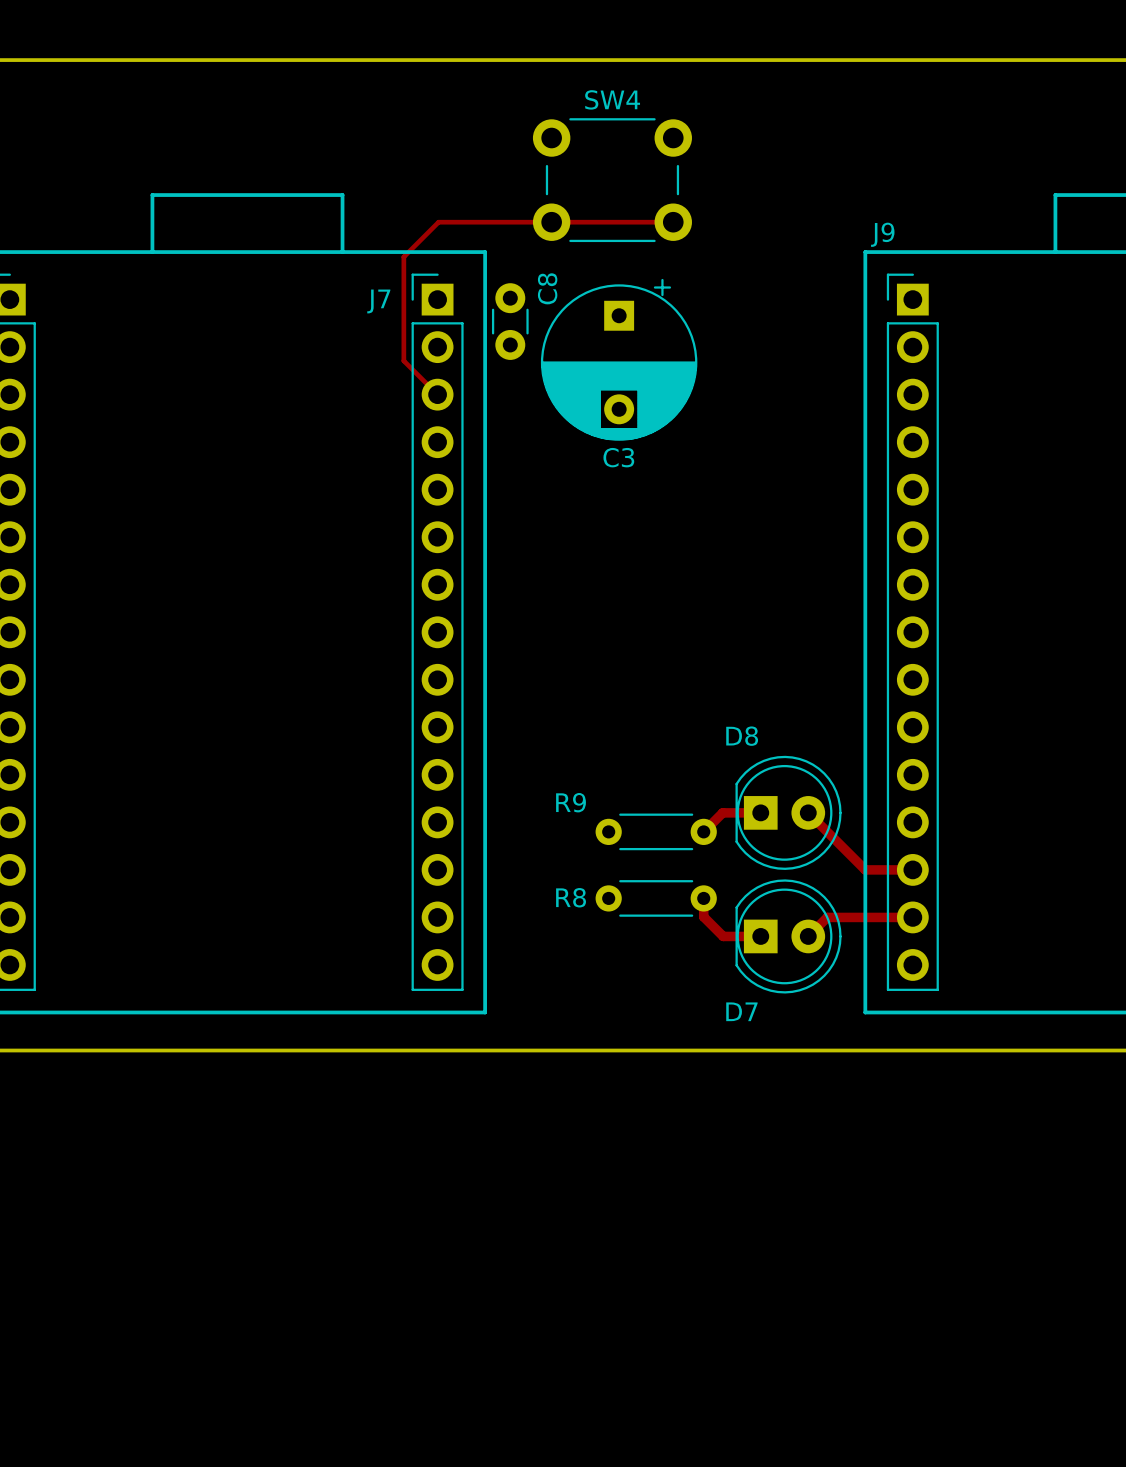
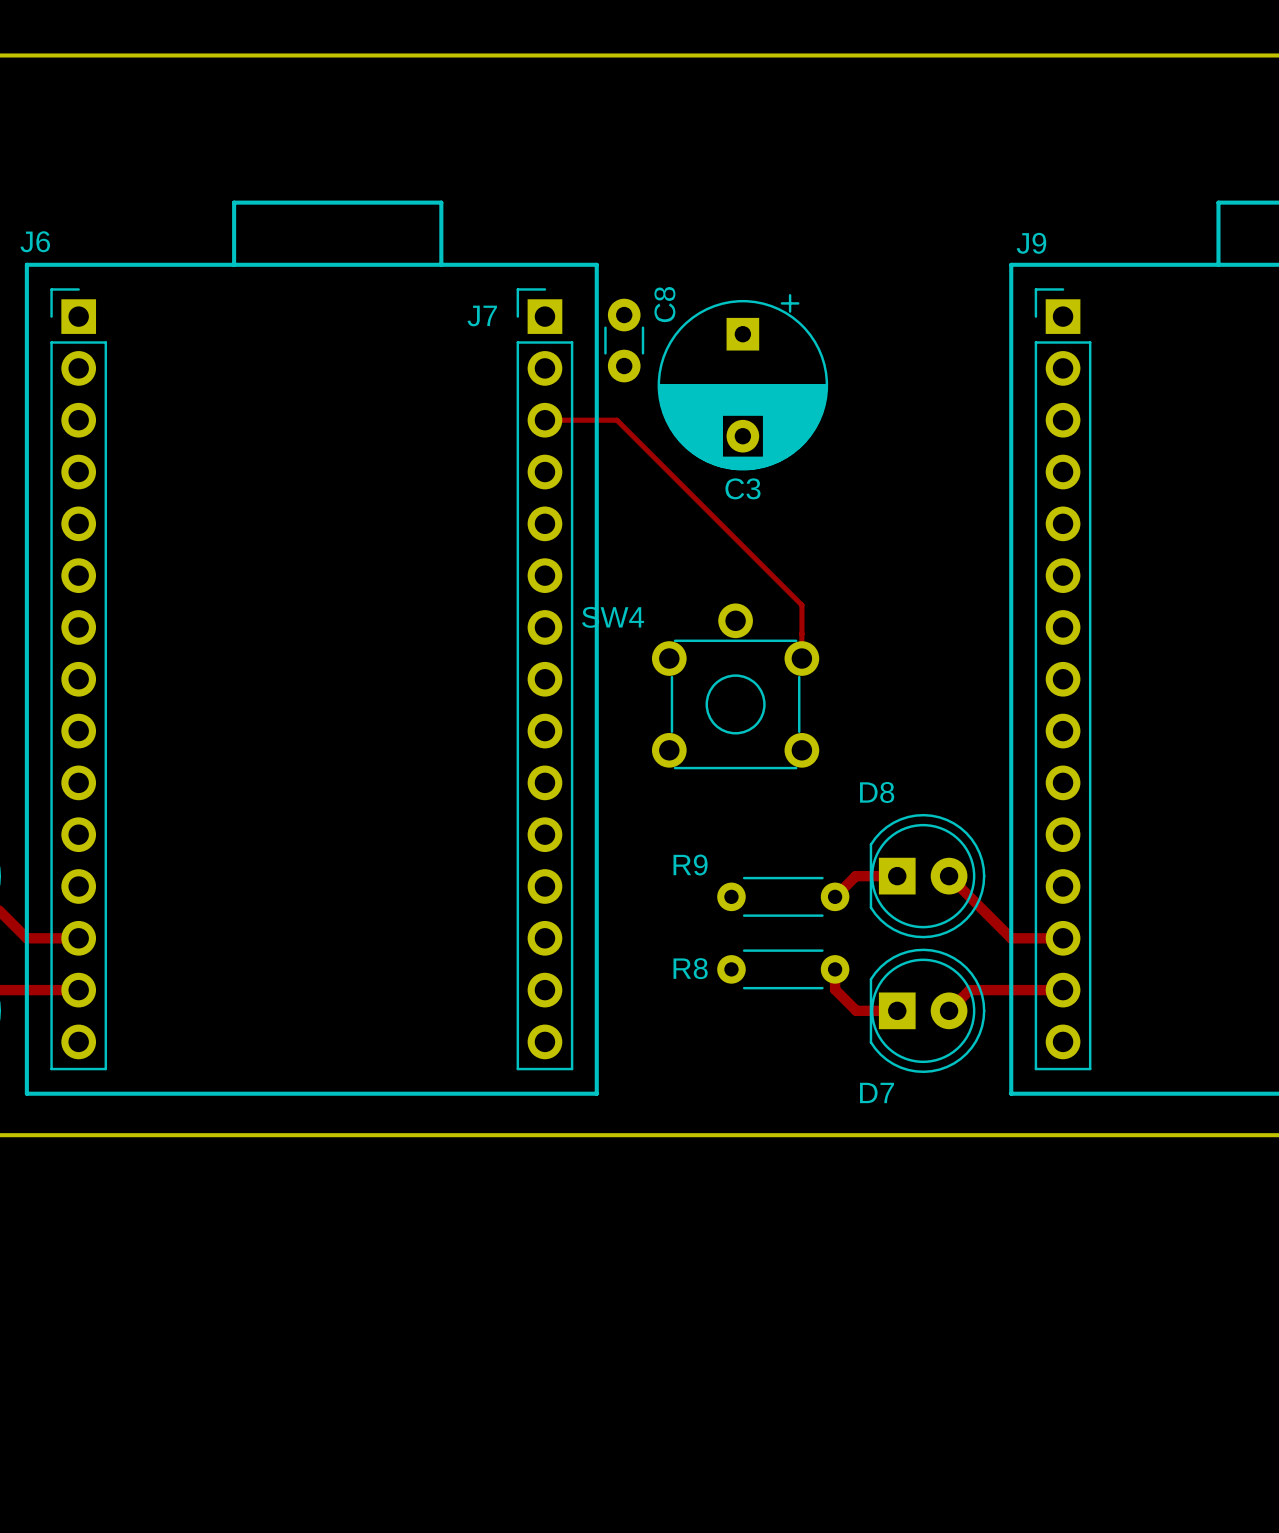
SW4 name position: SW4 (612, 99) -> SW4 (613, 617)
SW4 footprint: [532, 118, 692, 243] -> [651, 603, 820, 770]
track: (673, 222) (438, 222) (403, 256) (403, 360) (437, 394) -> (801, 658) (801, 605) (616, 420) (544, 420)

